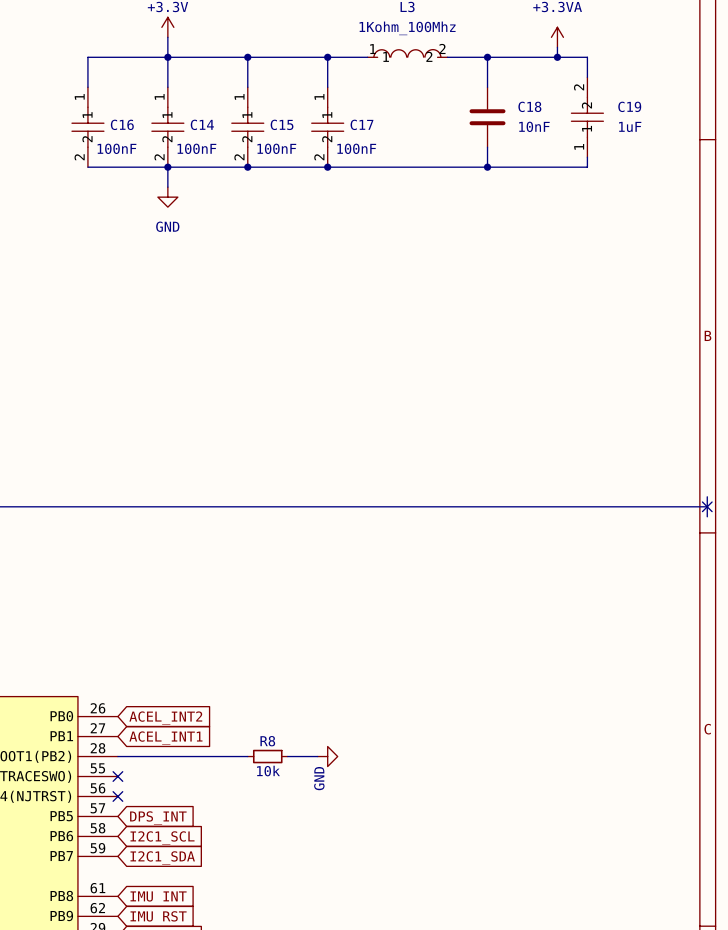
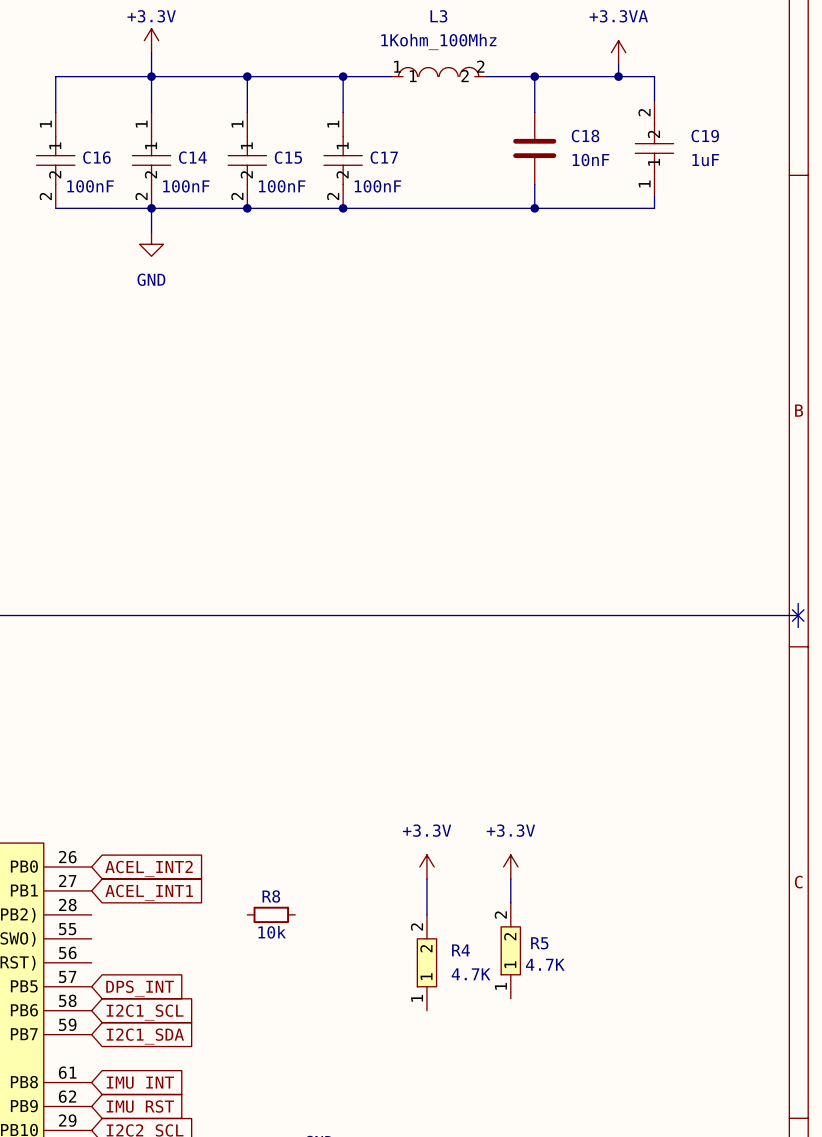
power symbol: none -> +3.3V (426, 866)
power symbol: none -> +3.3V (510, 866)
wire: none -> (426, 878) (426, 914)
wire: none -> (510, 878) (510, 902)
wire: (117, 756) (247, 756) -> none
wire: (287, 756) (317, 756) -> none
power symbol: GND (327, 756) -> none
no-connect mark: (117, 776) -> none
R5: none -> 4.7K (510, 950)
no-connect mark: (117, 796) -> none
R4: none -> 4.7K (426, 962)

